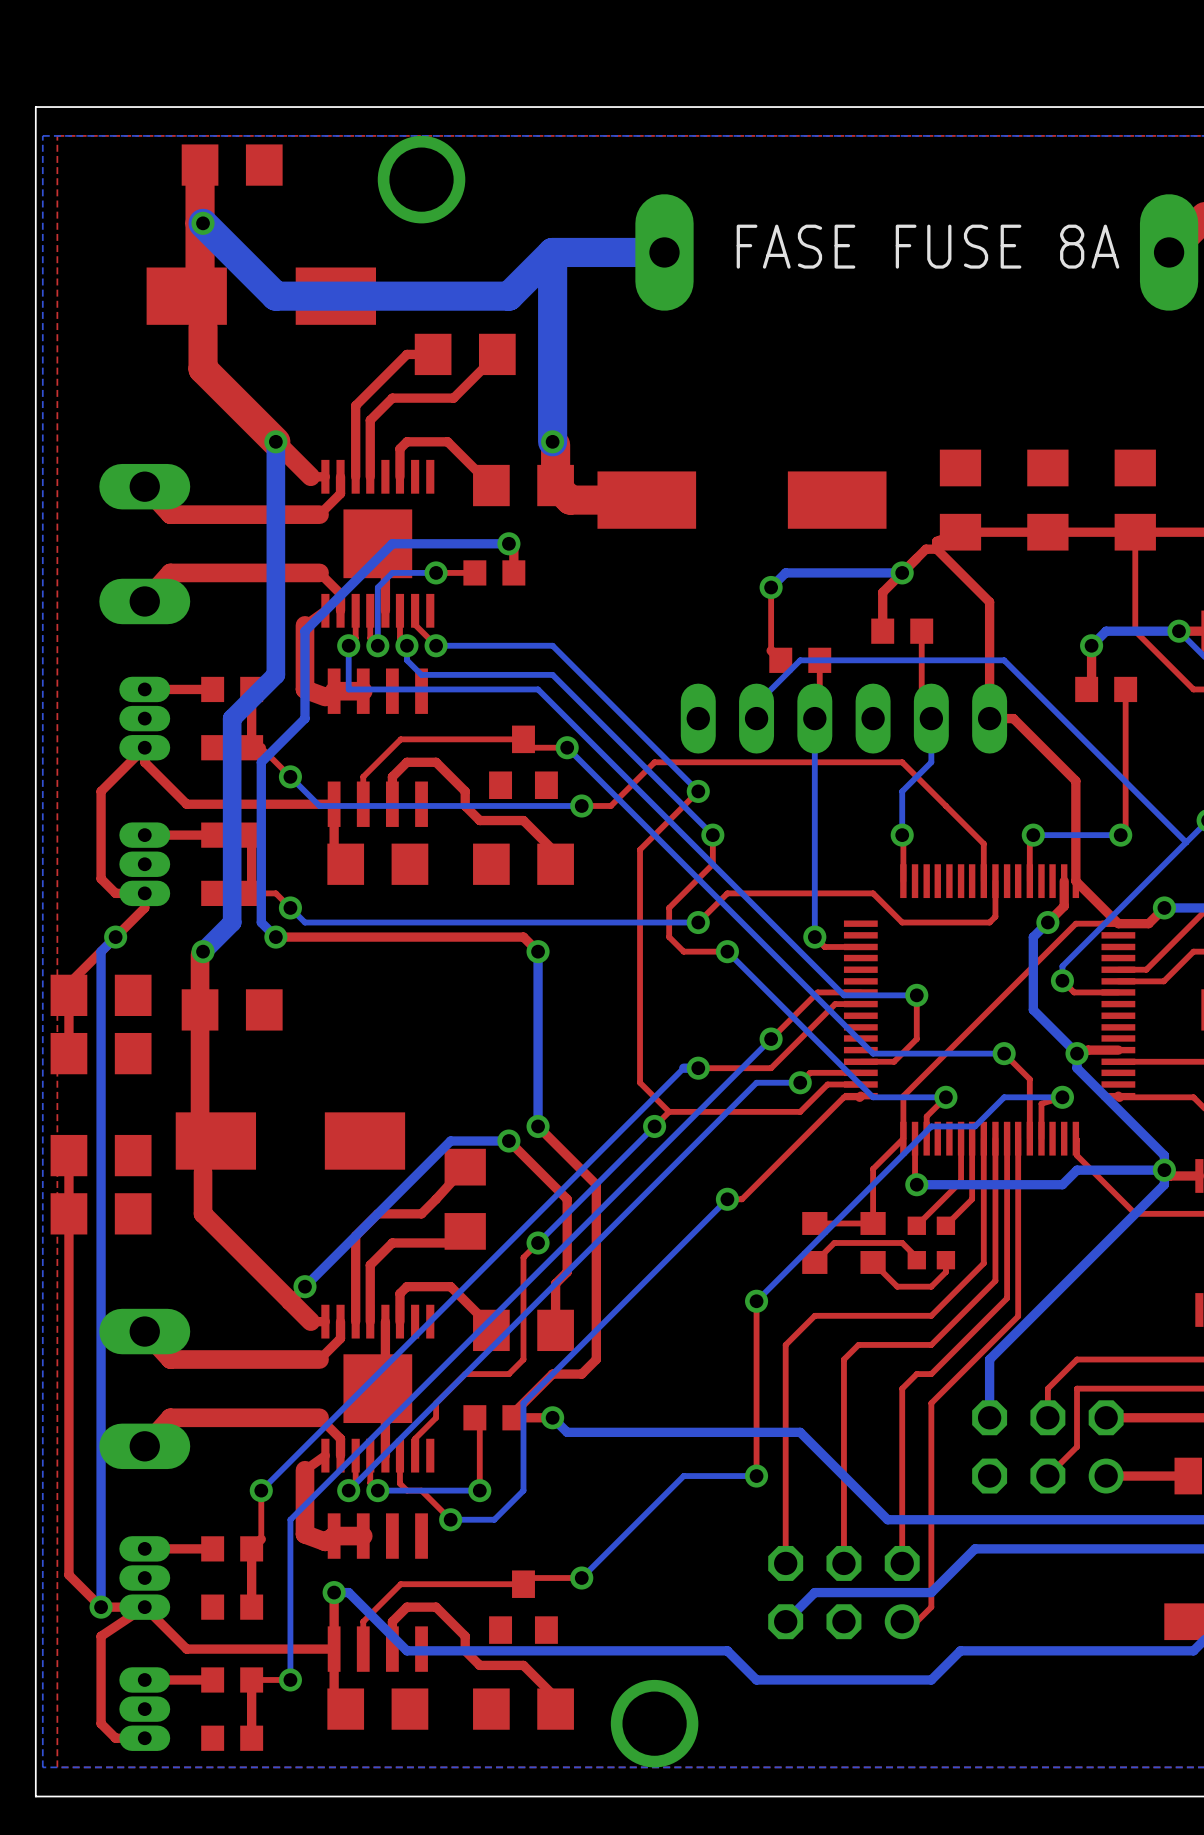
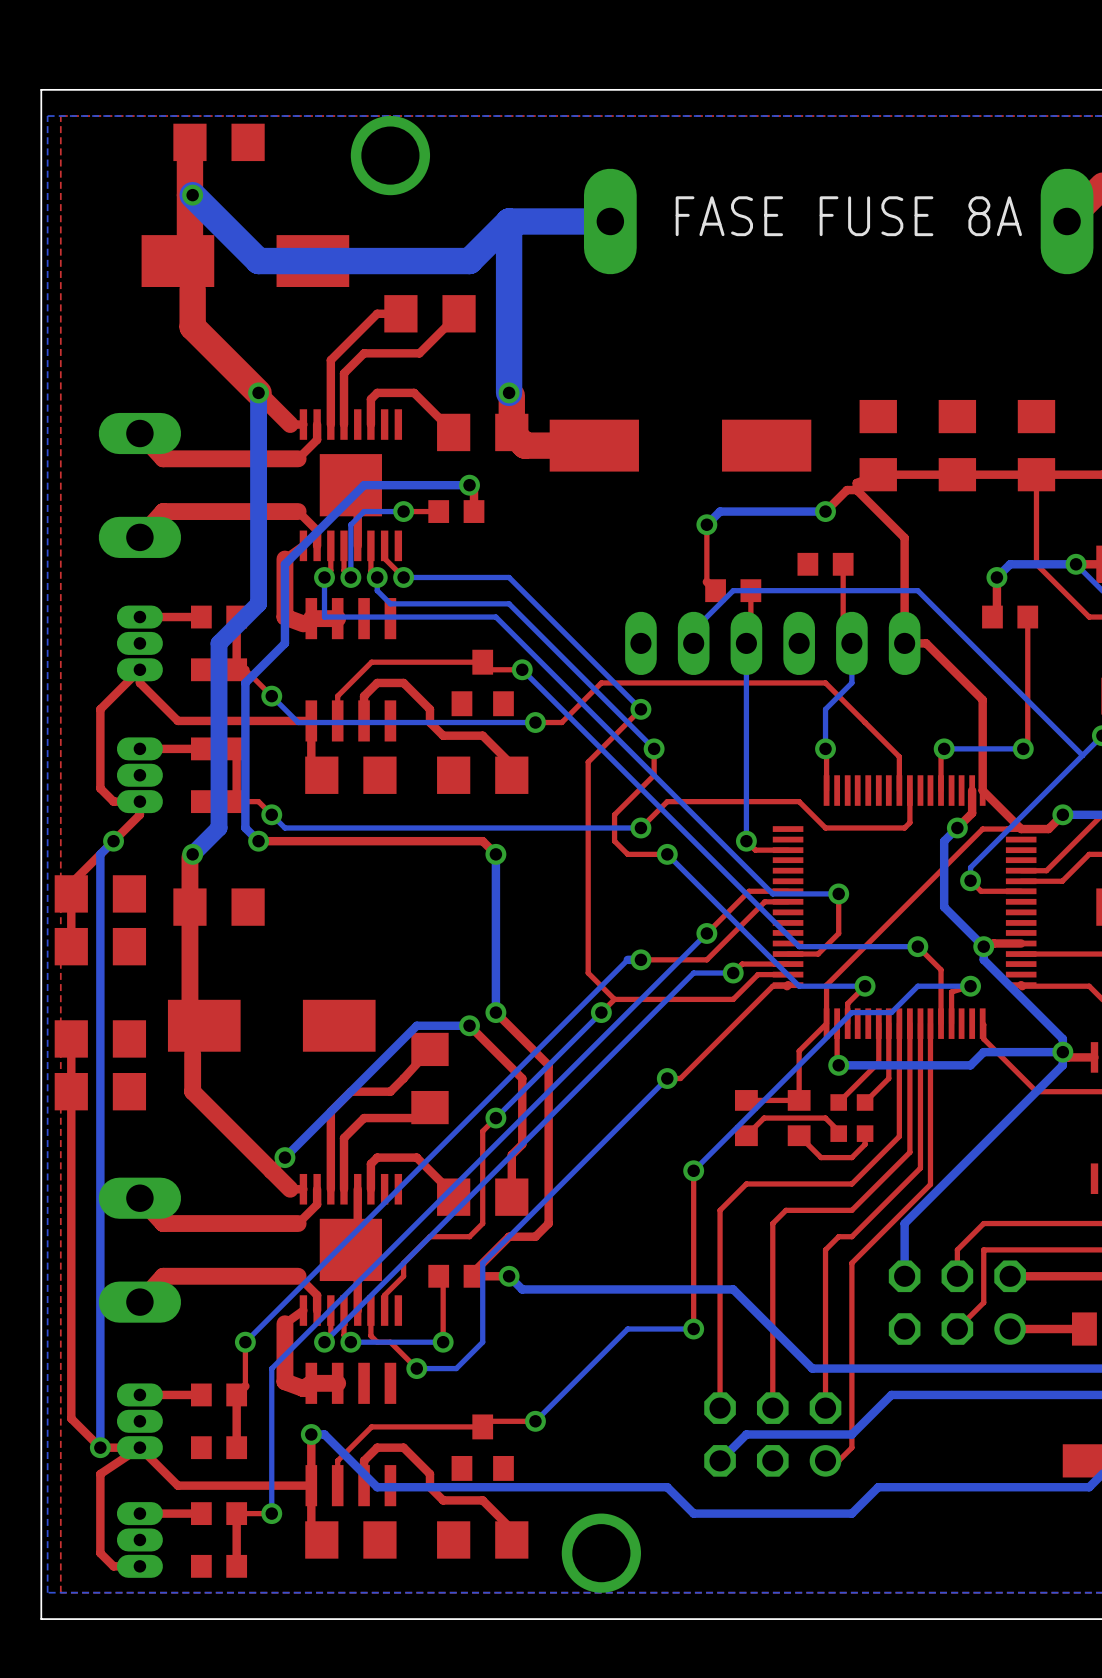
top track: (902, 572) (882, 592) (882, 631) -> none

